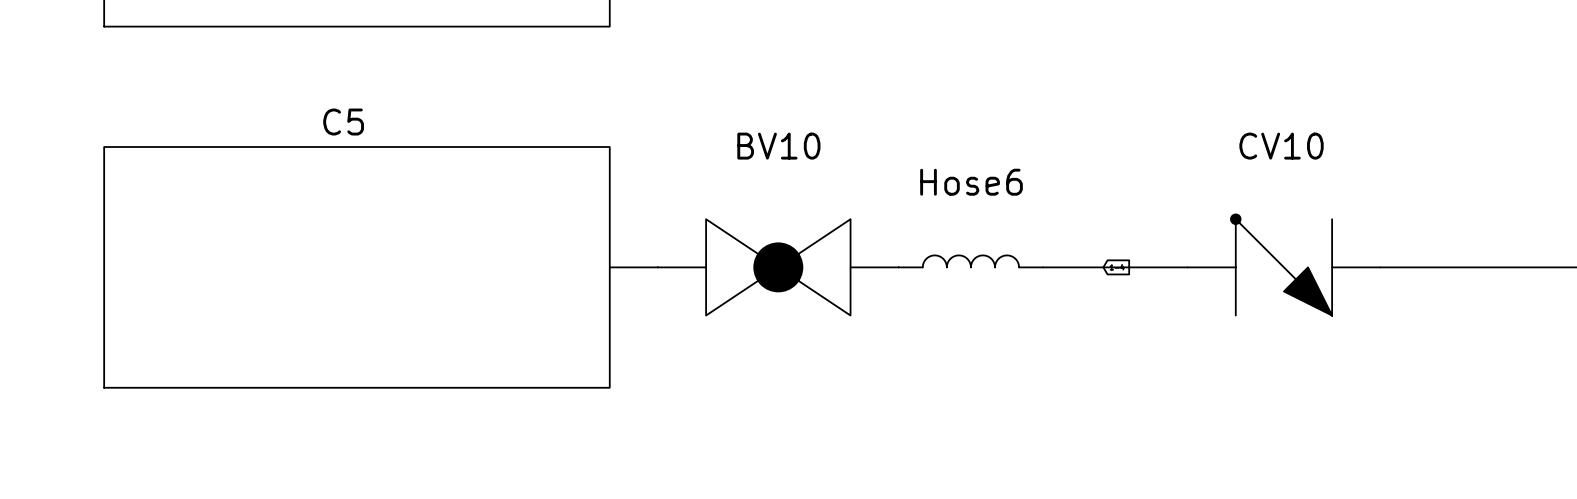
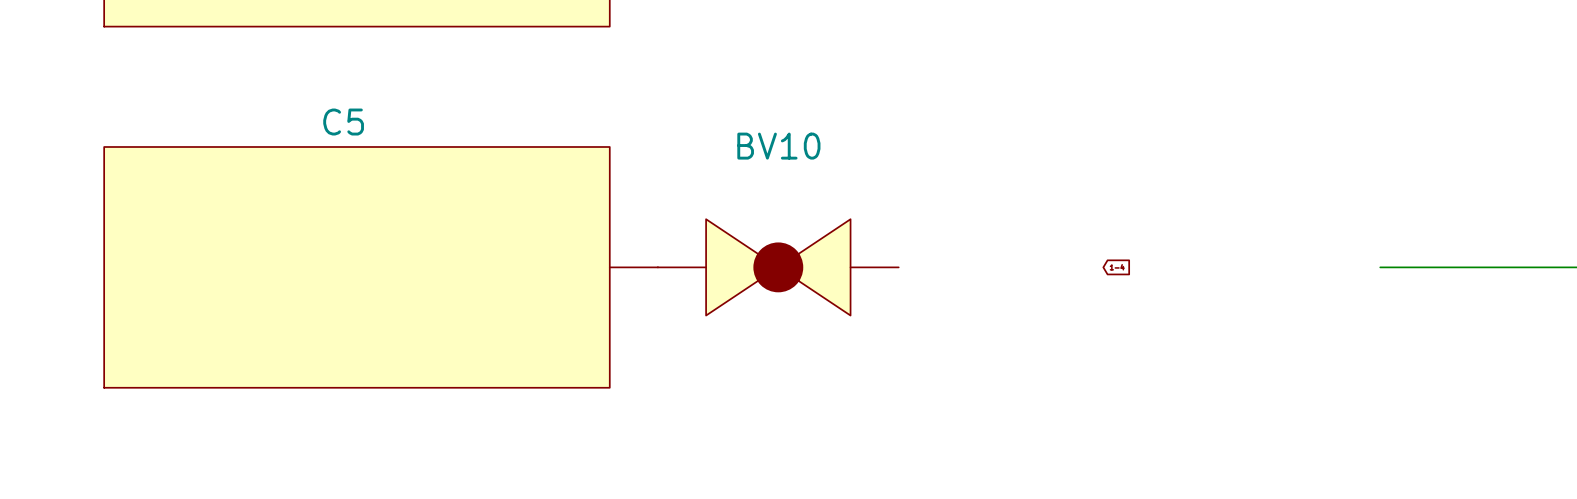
Hose6: (970, 261) -> none
CV10: (1283, 264) -> none
wire: (1043, 267) (1187, 267) -> none

